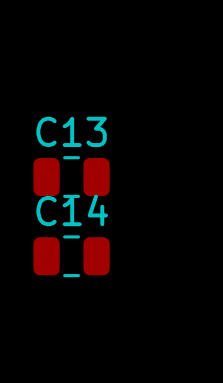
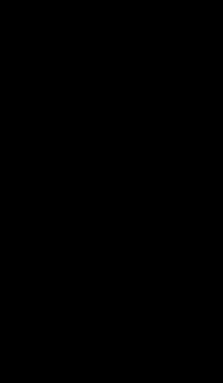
C13: (71, 177) -> none
C14: (71, 256) -> none

